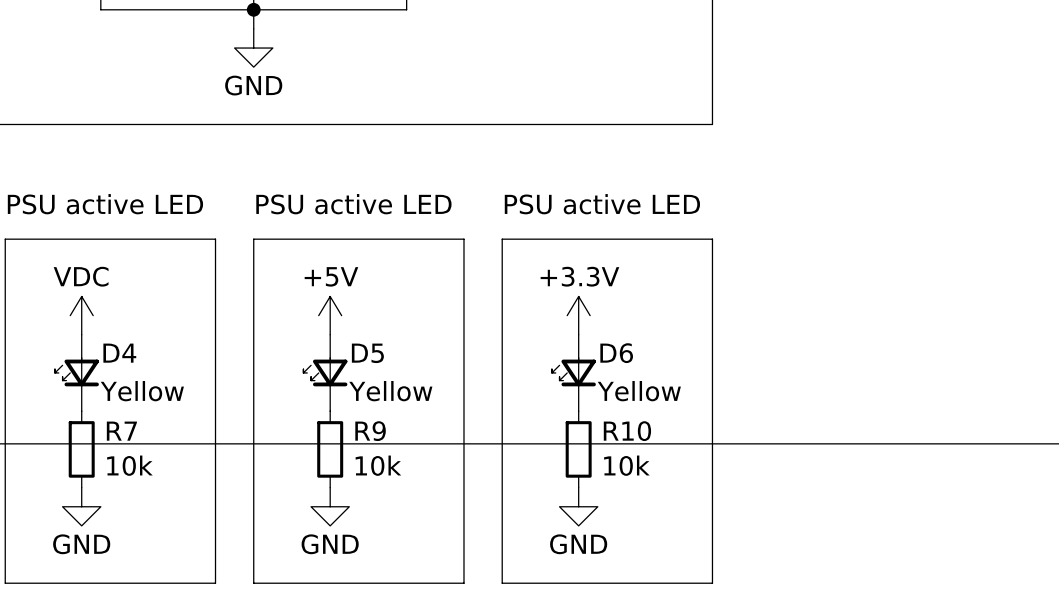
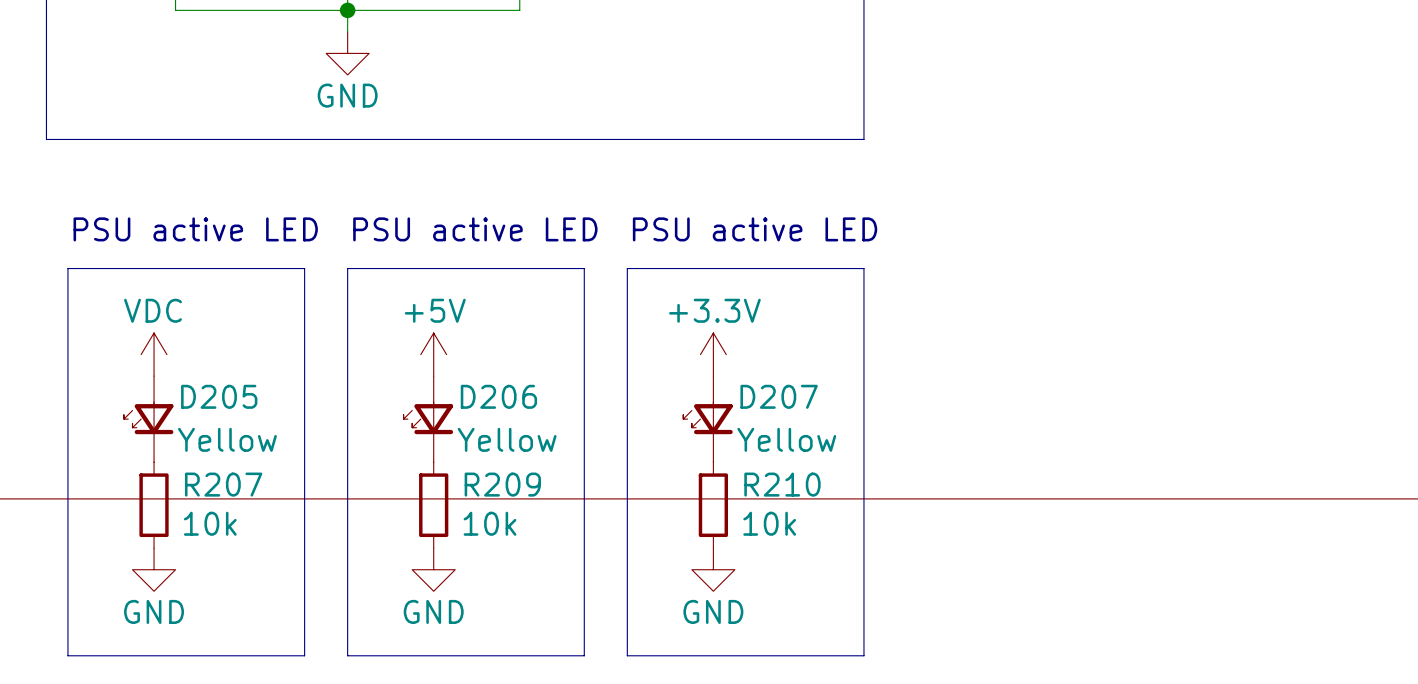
D4 name: D4 (119, 353) -> D205 (219, 396)
D5 name: D5 (367, 353) -> D206 (498, 396)
D6 name: D6 (616, 353) -> D207 (779, 396)
R7 name: R7 (121, 431) -> R207 (223, 484)
R9 name: R9 (370, 431) -> R209 (502, 484)
R10 name: R10 (627, 431) -> R210 (782, 484)

